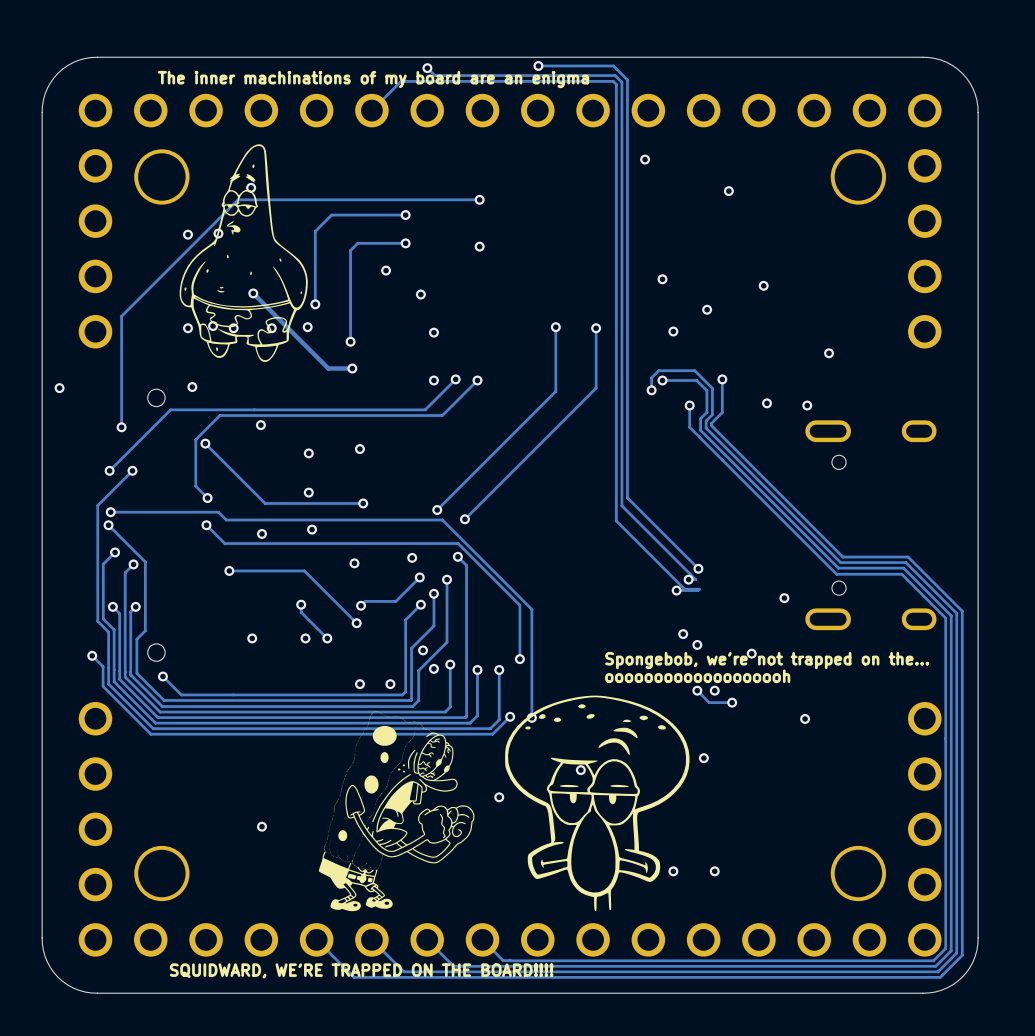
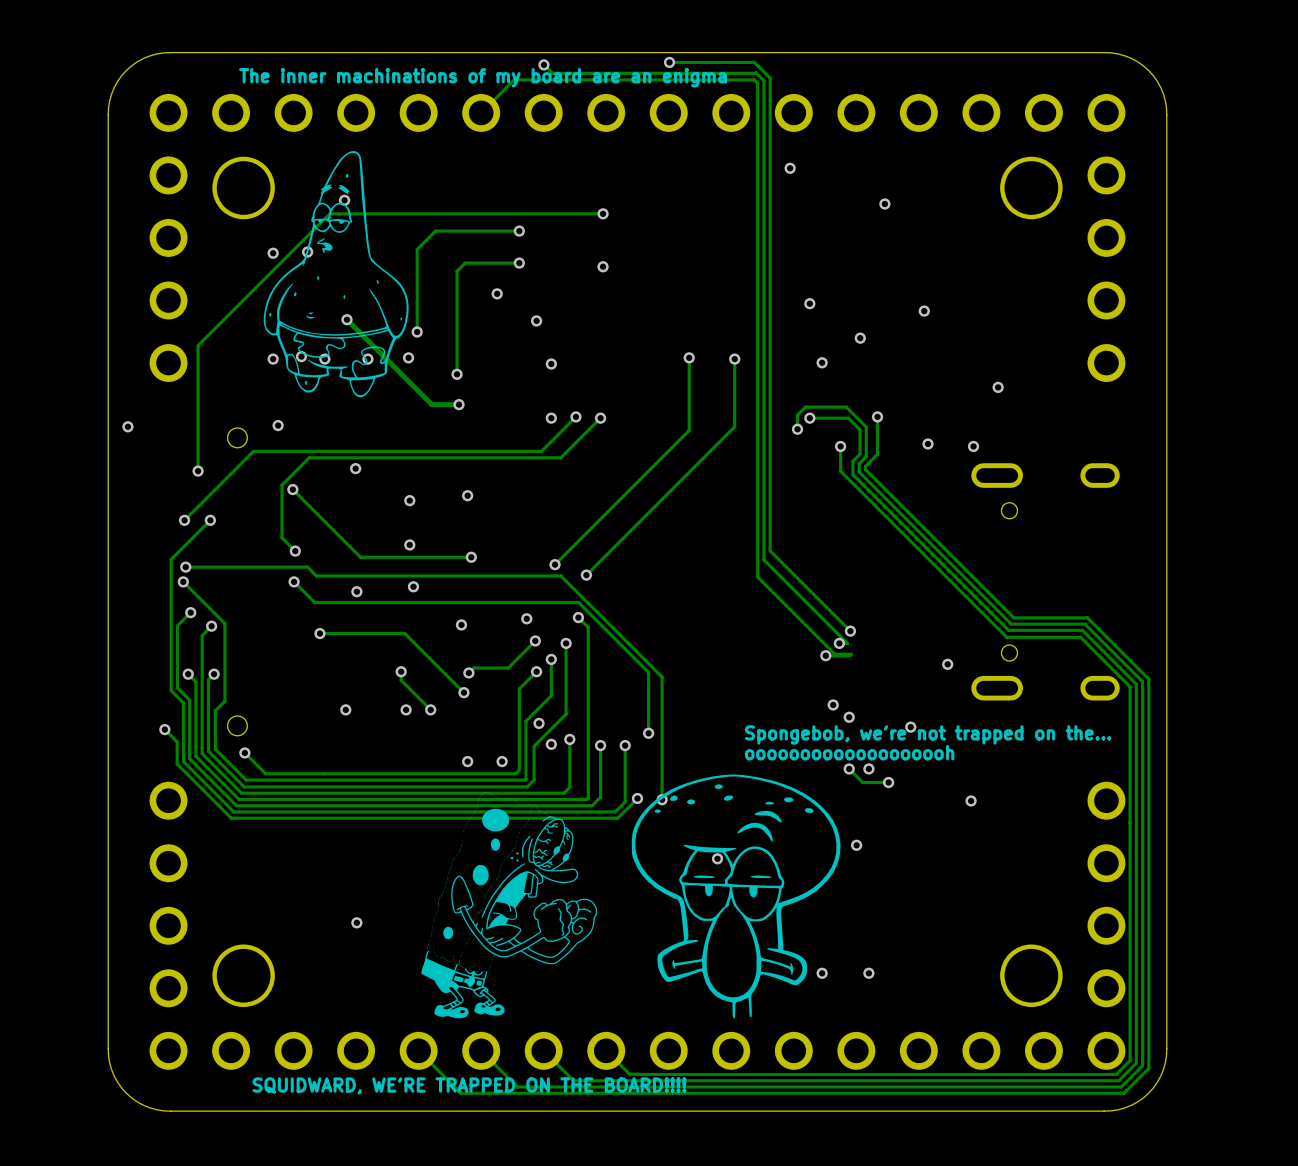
via: (499, 797) -> none

